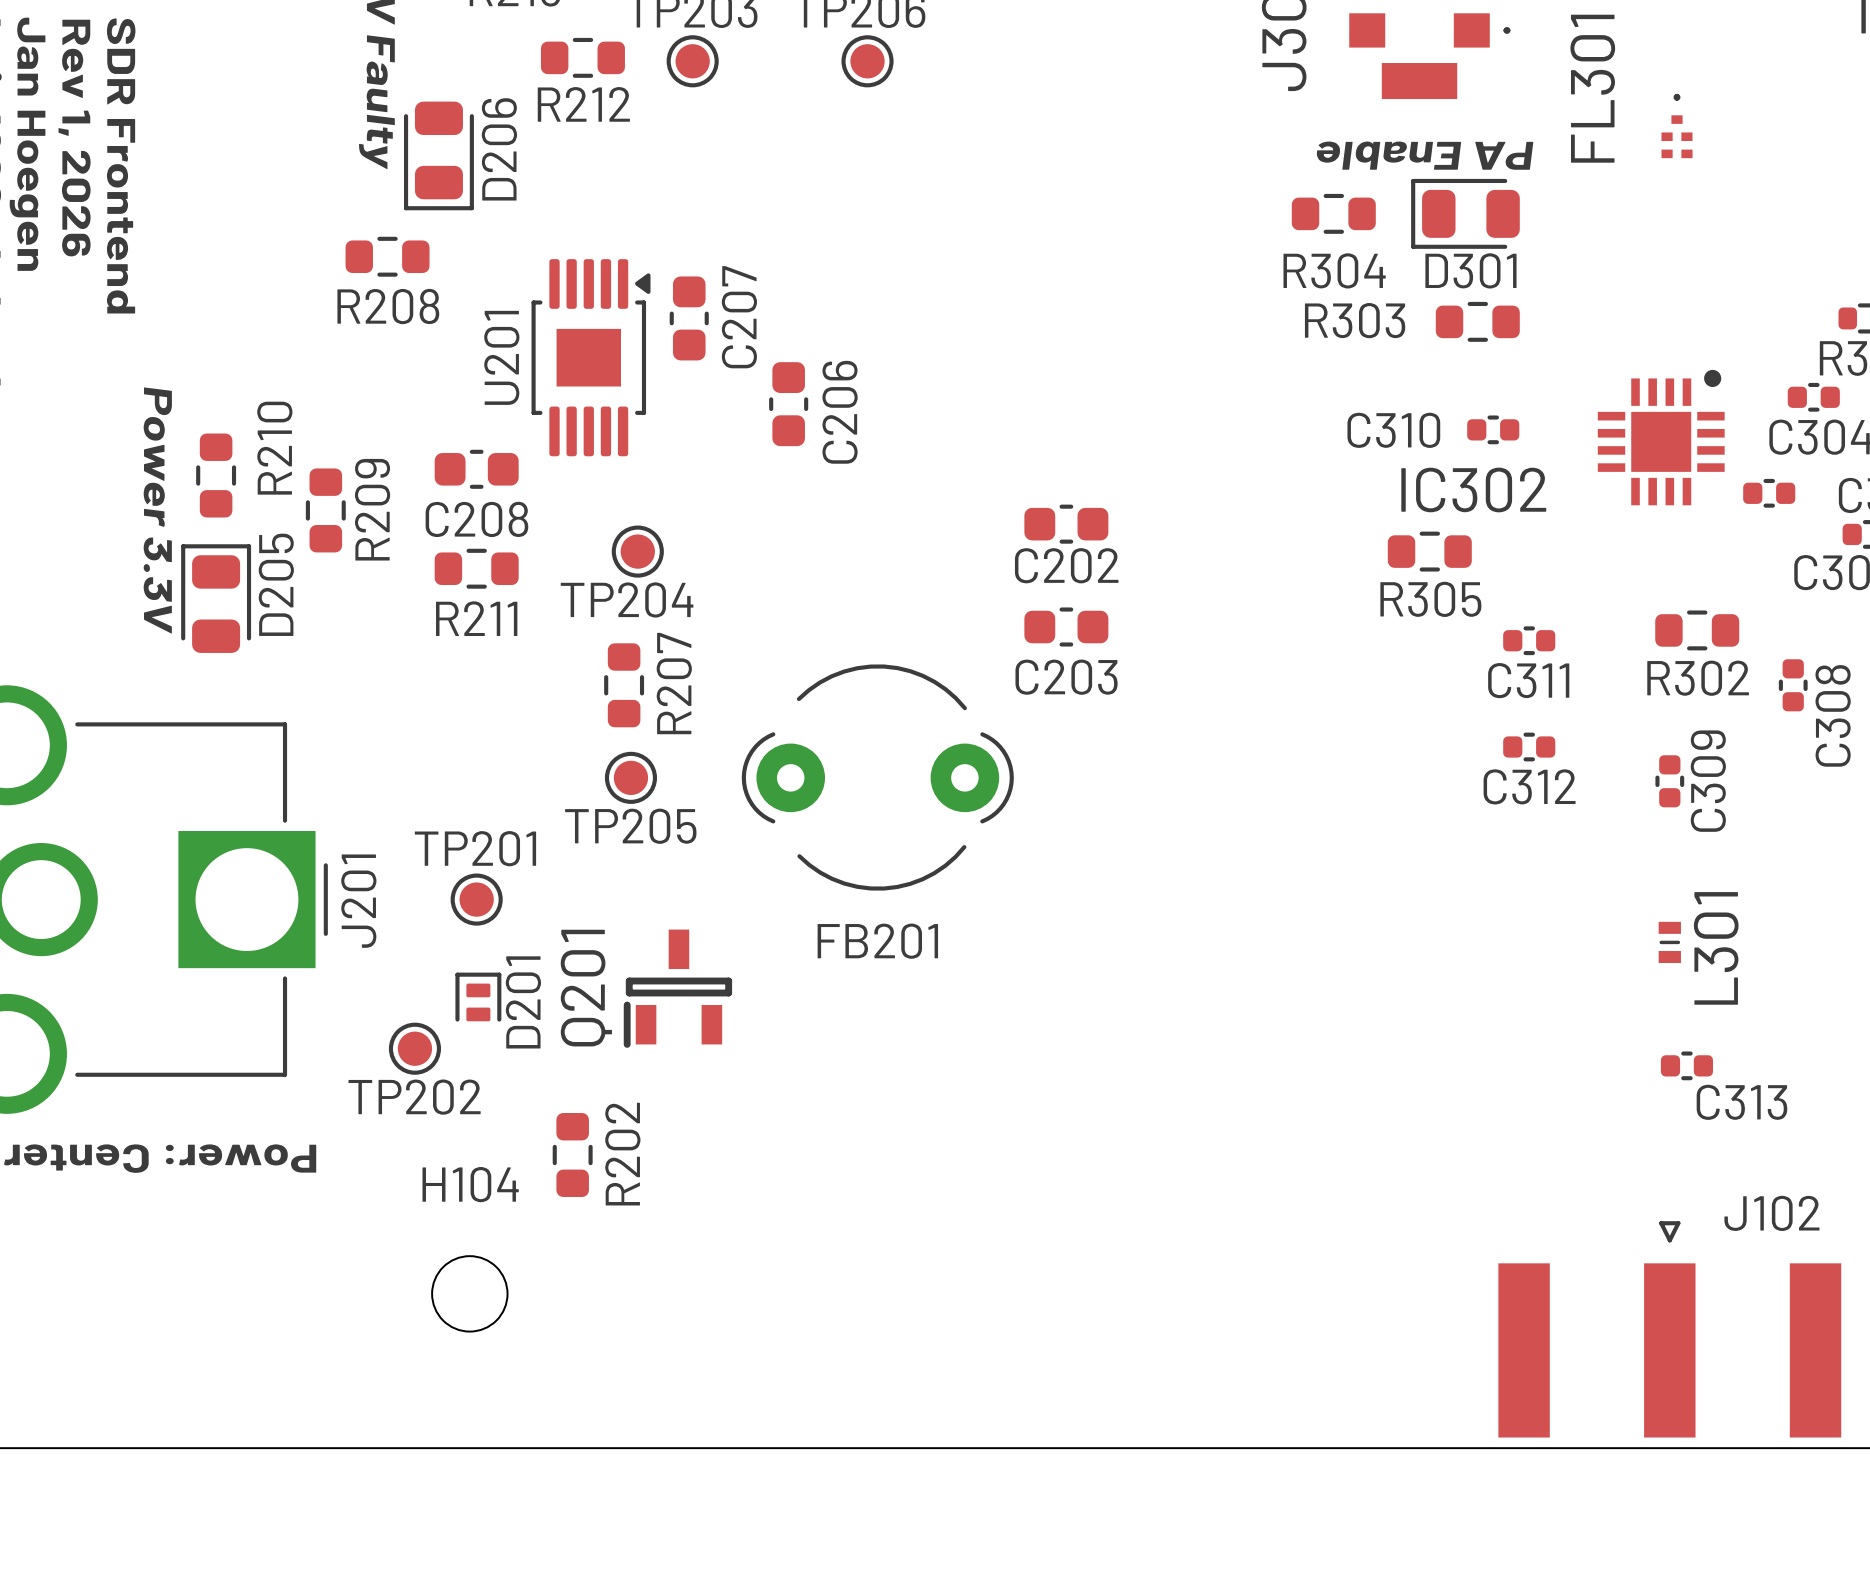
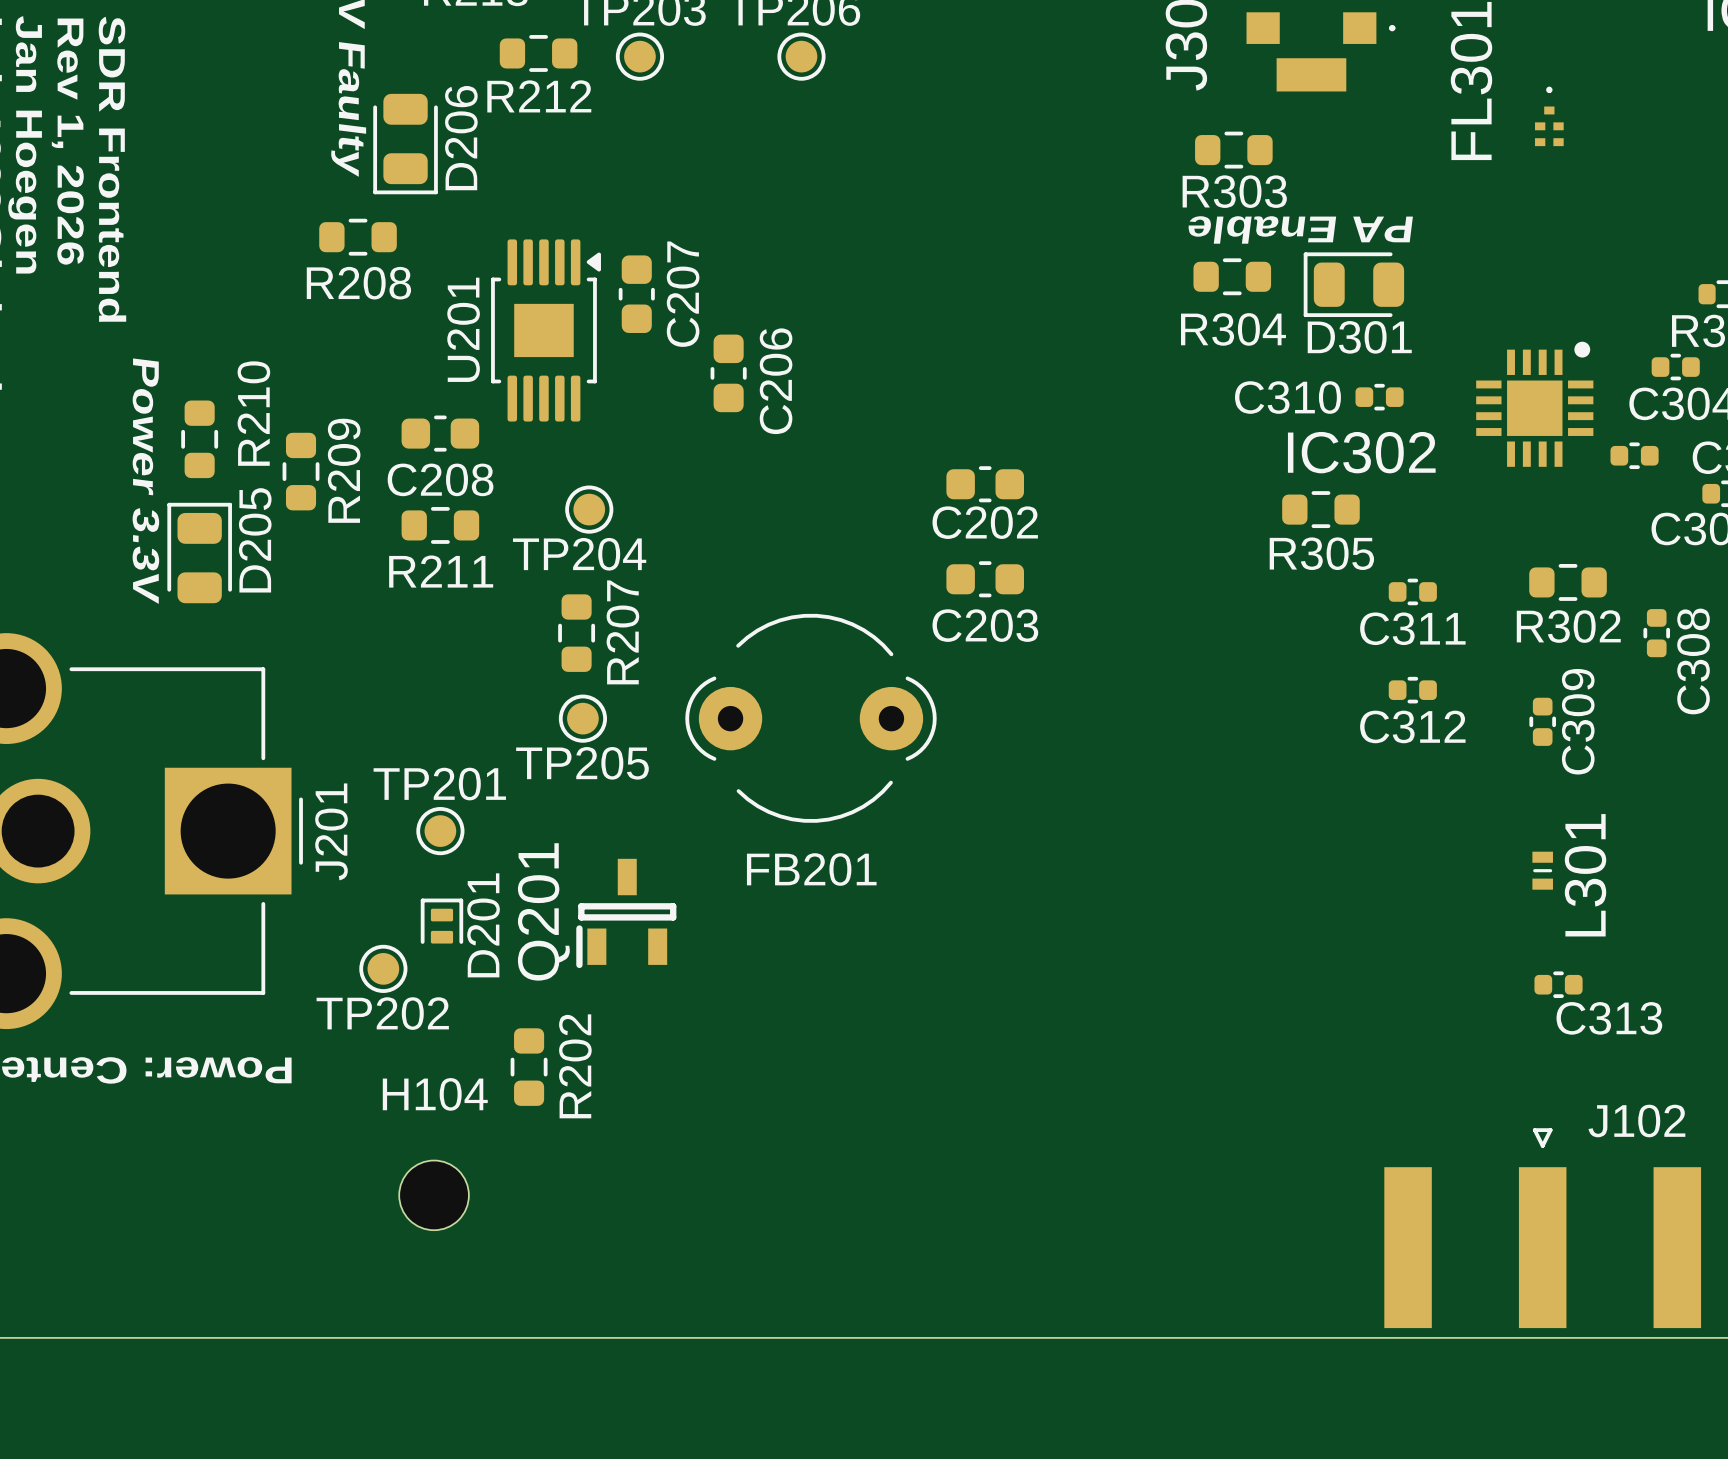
text position: PA Enable (1425, 155) -> PA Enable (1300, 229)
R304 position: (1333, 213) -> (1232, 276)
D301 position: (1465, 213) -> (1353, 284)
R303 name position: R303 (1355, 320) -> R303 (1234, 191)
R303 position: (1477, 321) -> (1233, 150)

